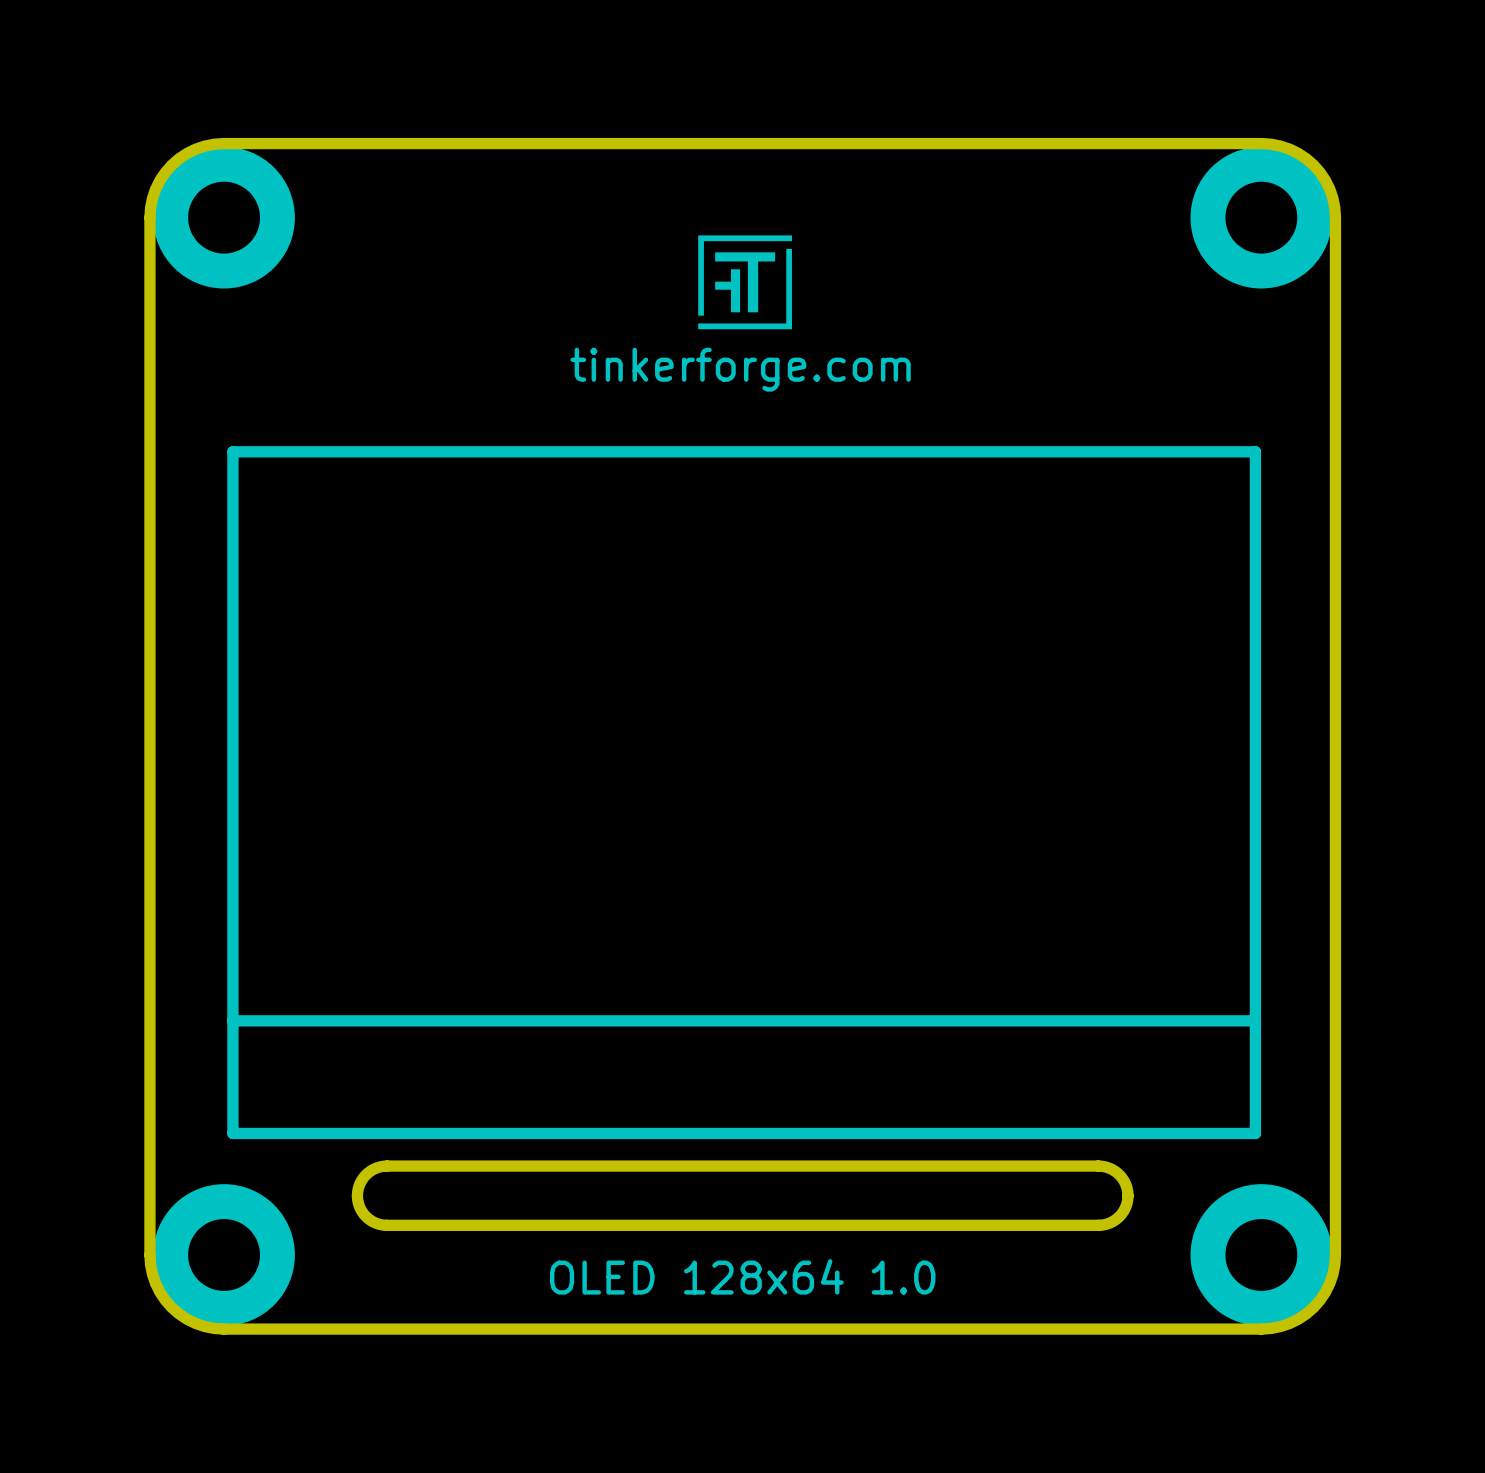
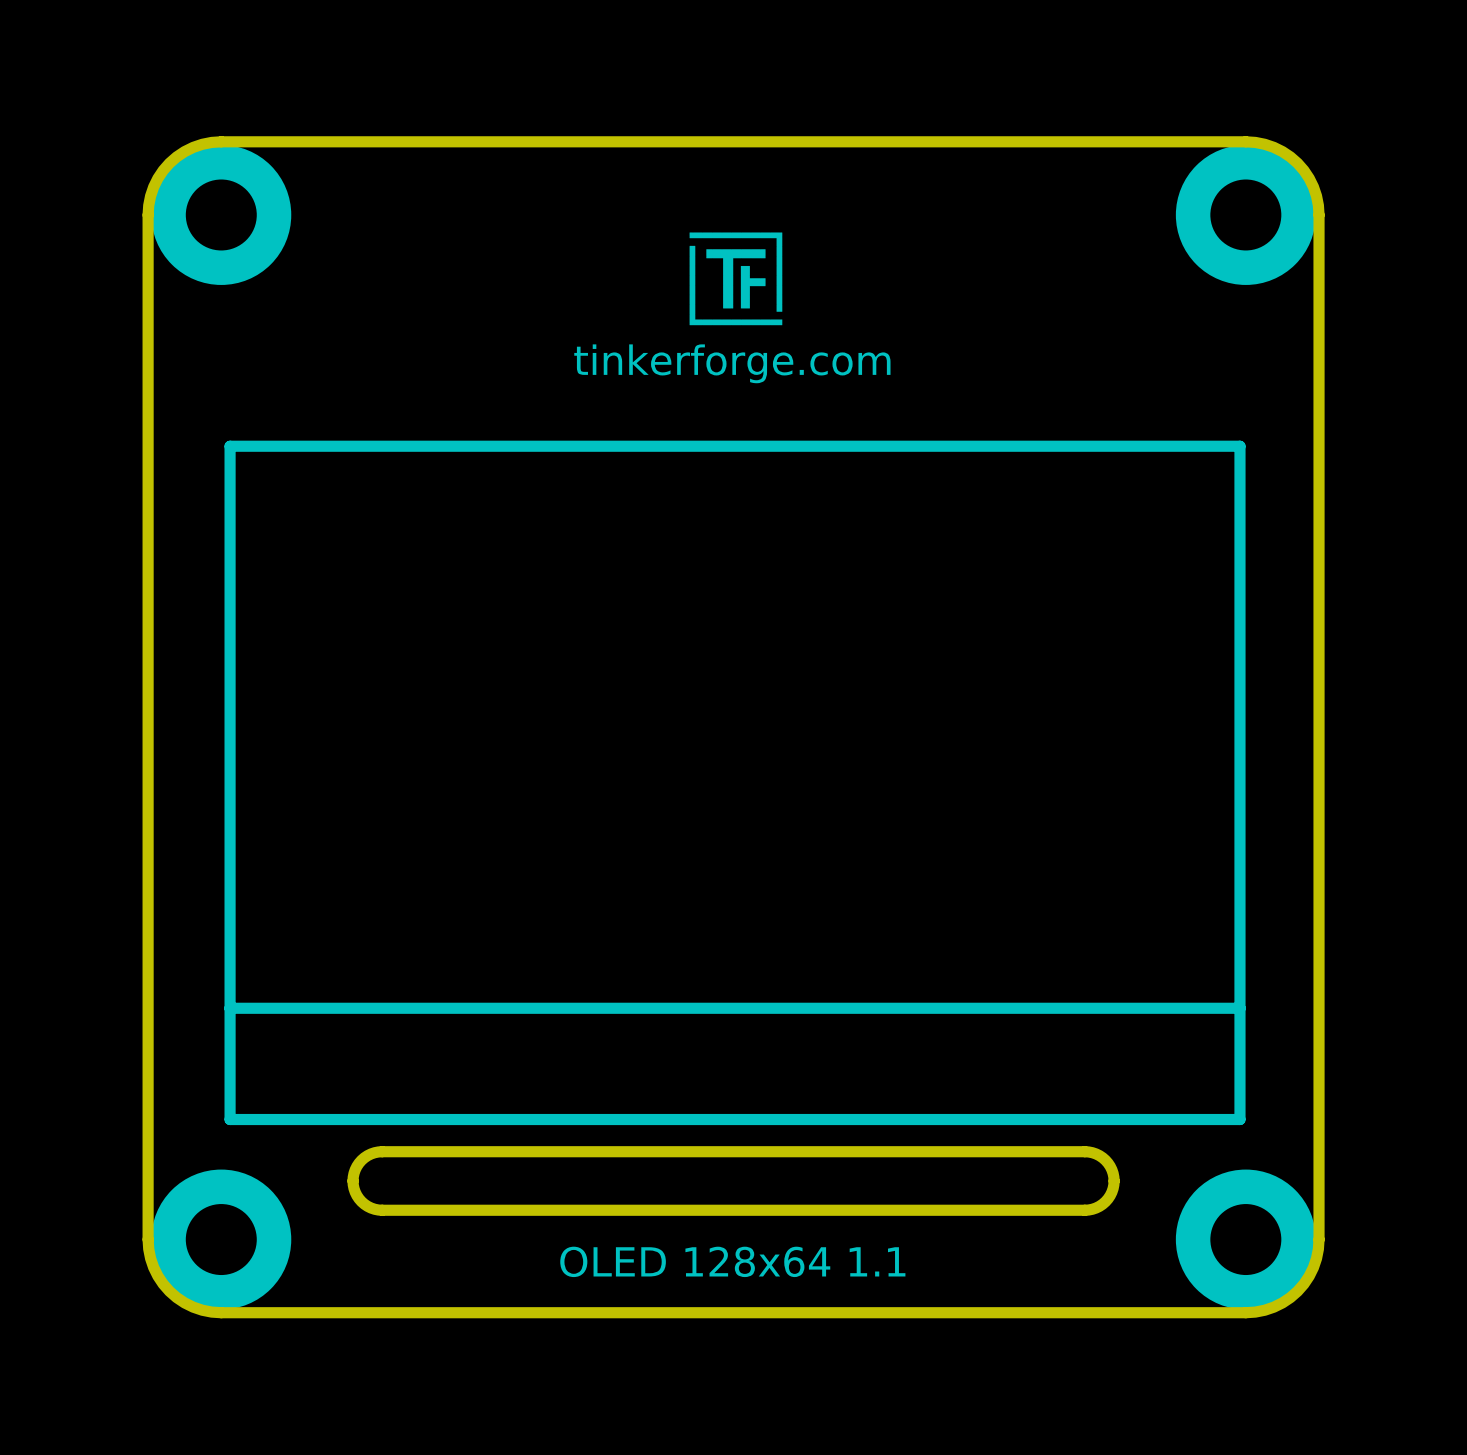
drawing shape: [698, 235, 793, 330] -> [689, 232, 783, 326]
text: OLED 128x64 1.0 (742, 1276) -> OLED 128x64 1.1 (732, 1261)

